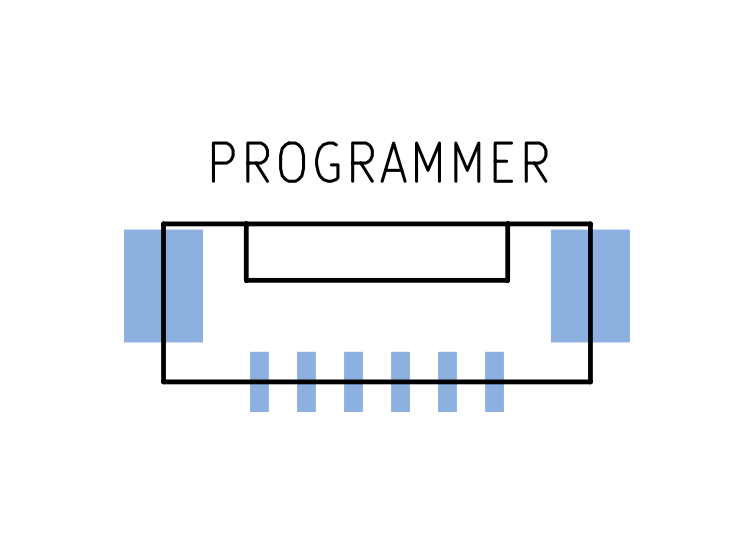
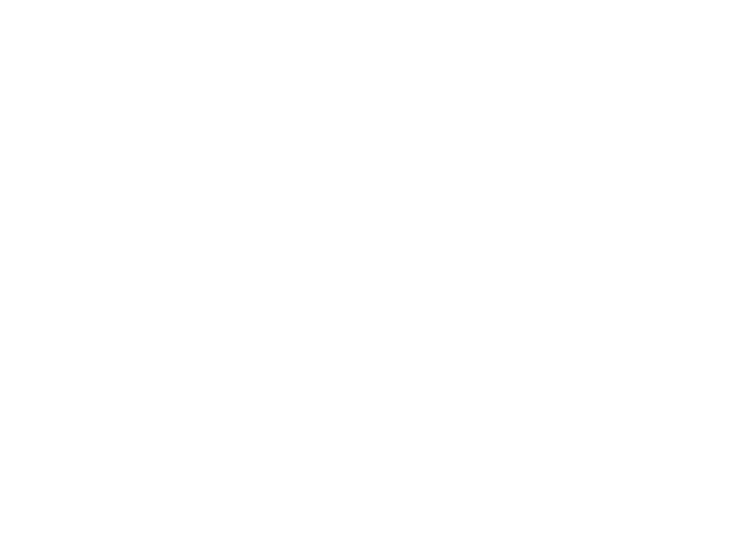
PROGRAMMER: (376, 316) -> none

